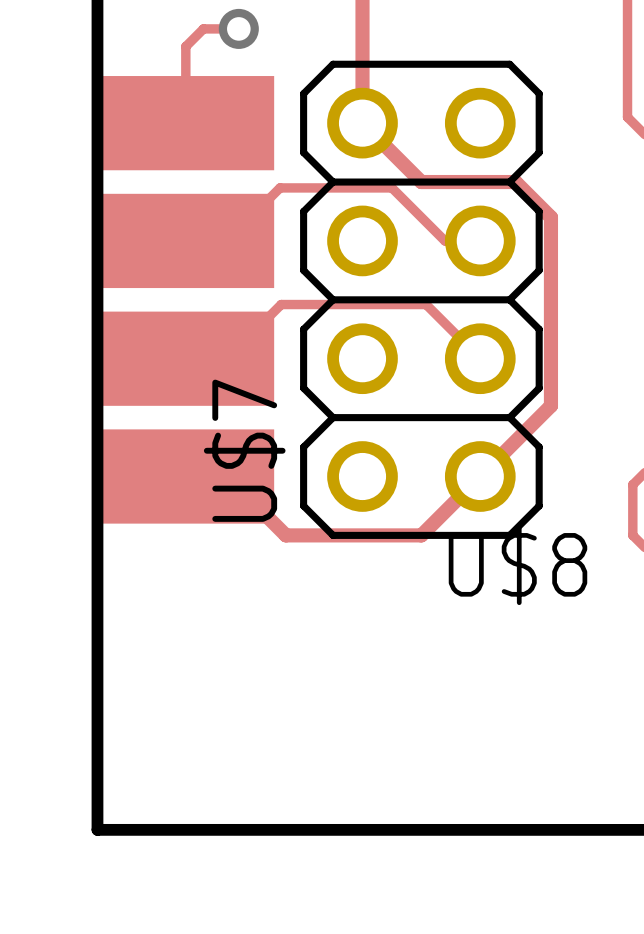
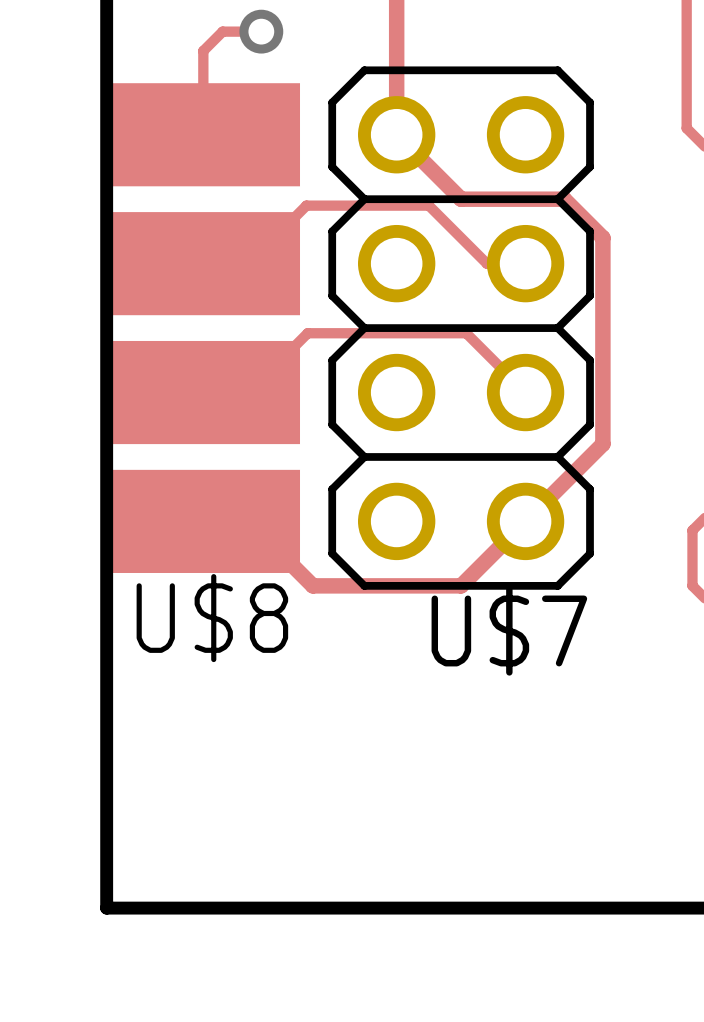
U$7 name rotation: 0° (244, 450) -> 90° clockwise (509, 630)
U$7 name position: U$7 (244, 450) -> U$7 (509, 630)
U$8 name position: U$8 (517, 564) -> U$8 (212, 618)

